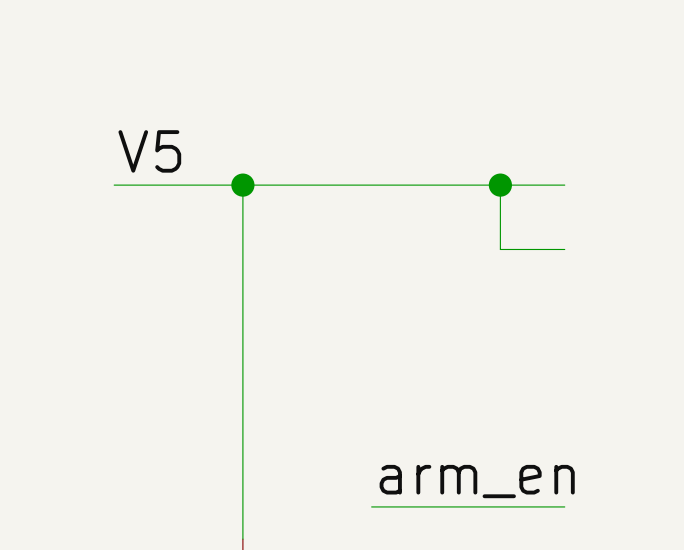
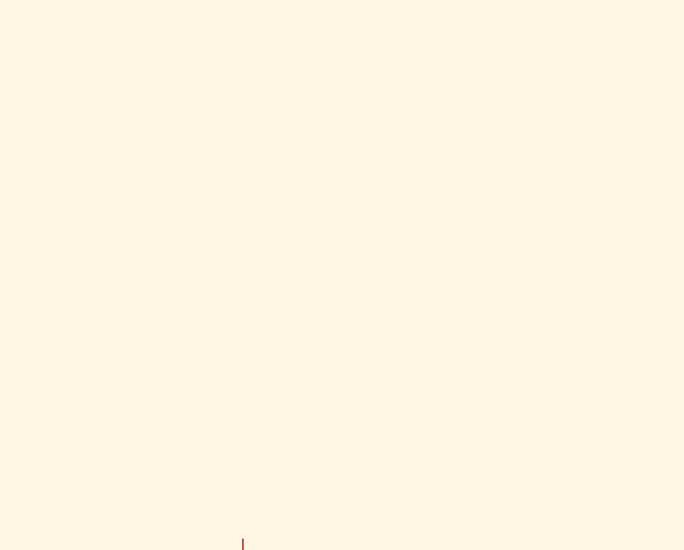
label: V5 (149, 151) -> none
wire: (114, 185) (564, 185) -> none
wire: (242, 185) (242, 539) -> none
junction: (242, 185) -> none
wire: (500, 185) (500, 249) (564, 249) -> none
junction: (500, 185) -> none
label: arm_en (477, 481) -> none
wire: (371, 506) (564, 506) -> none

